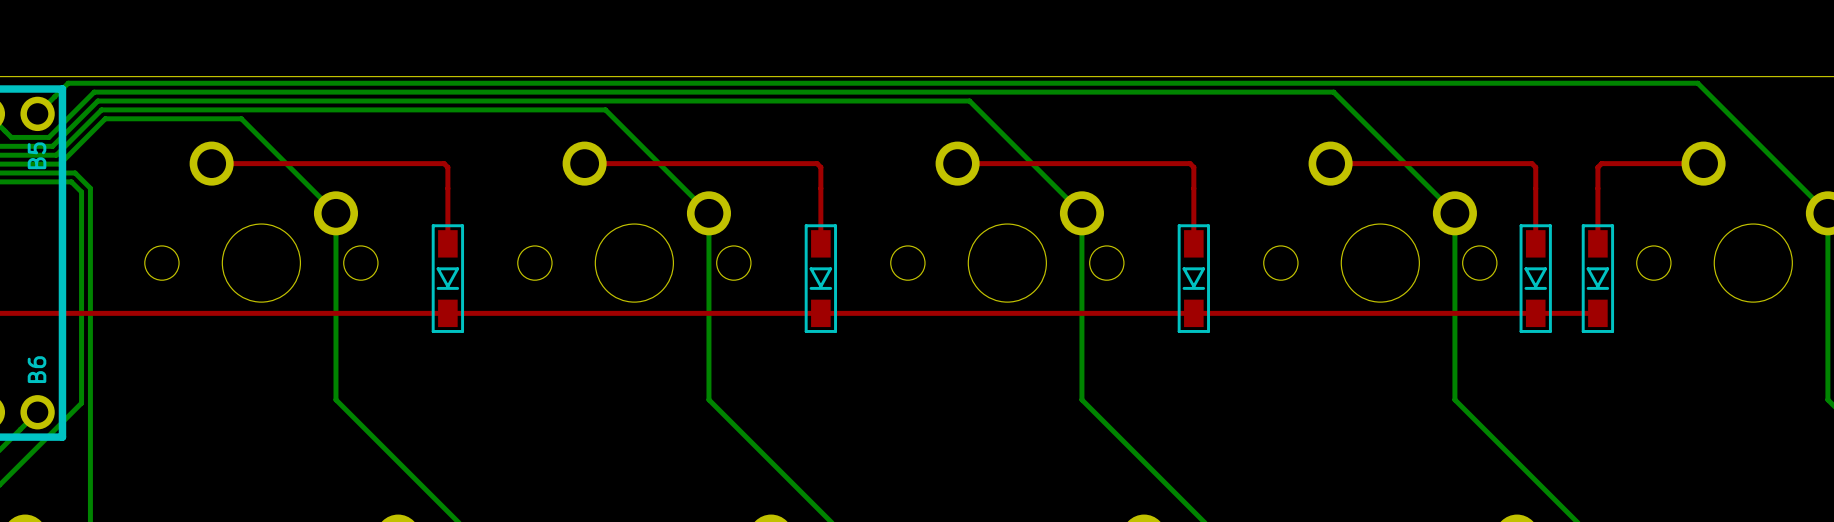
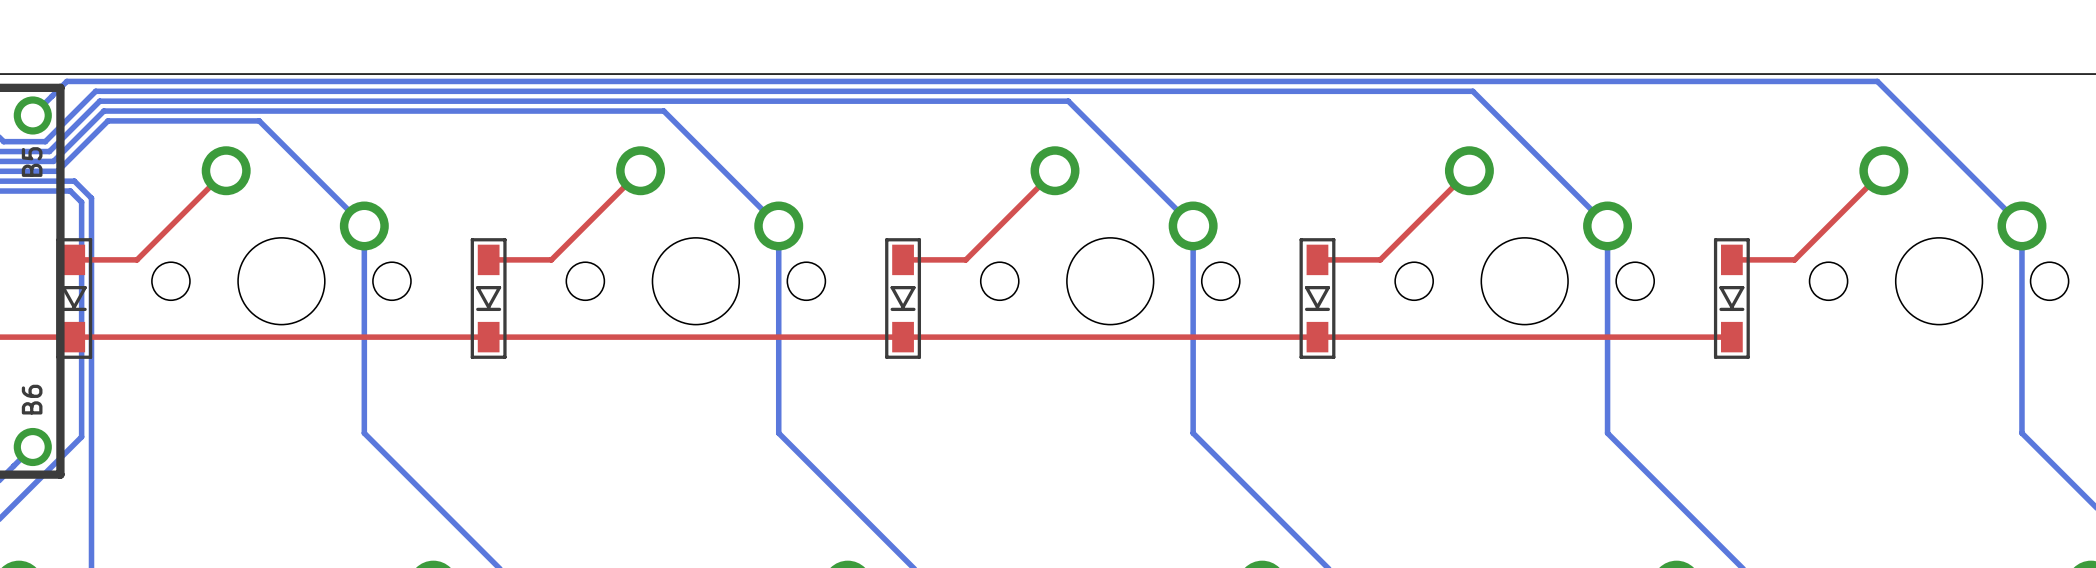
top track: (211, 163) (444, 163) (447, 167) (447, 243) -> (640, 170) (551, 259) (488, 259)
top track: none -> (226, 170) (137, 259) (74, 259)
top track: (584, 163) (817, 163) (820, 167) (820, 243) -> (1055, 170) (965, 259) (903, 259)
top track: (957, 163) (1190, 163) (1193, 167) (1193, 243) -> none
top track: (1330, 163) (1532, 163) (1535, 167) (1535, 243) -> (1469, 170) (1380, 259) (1317, 259)
top track: (1703, 163) (1601, 163) (1597, 167) (1597, 243) -> (1883, 170) (1794, 259) (1731, 259)
part: none -> (74, 298)
part: (1535, 278) -> none
part: none -> (1731, 298)
part: (1597, 278) -> none
top track: (1566, 313) (1597, 313) -> none

